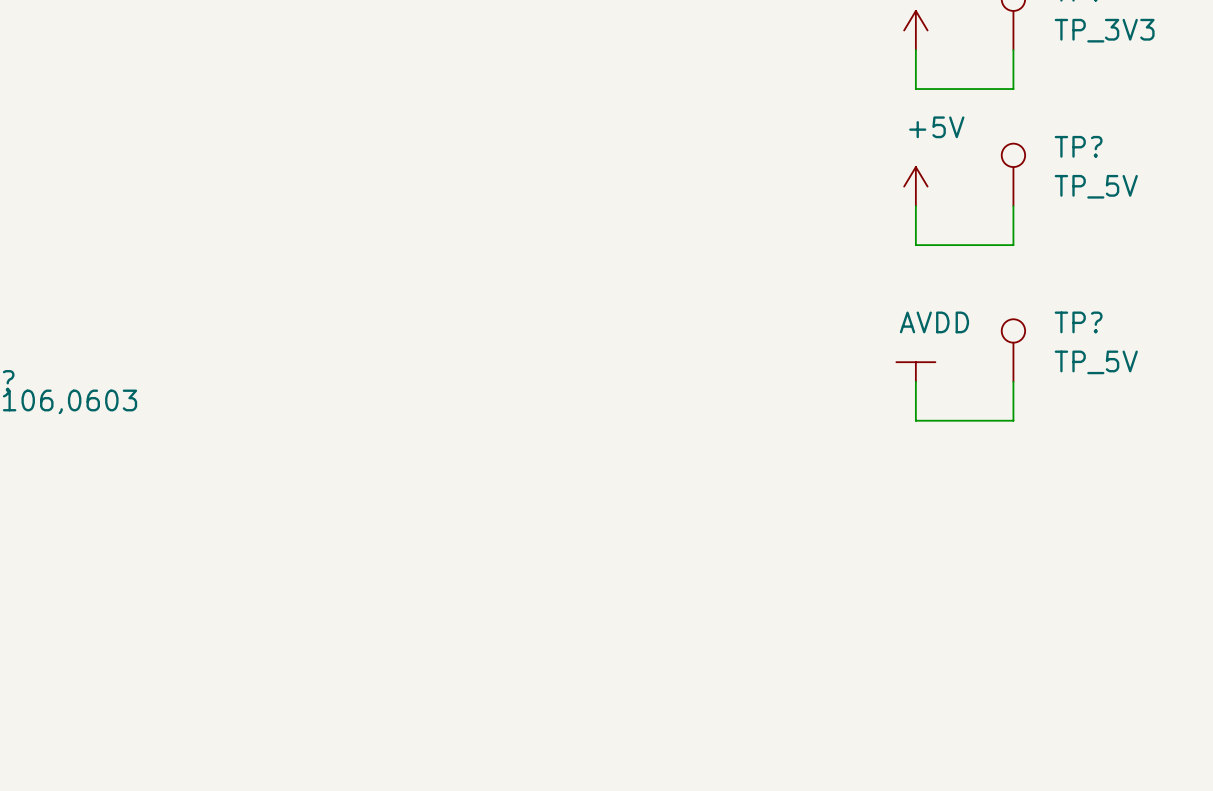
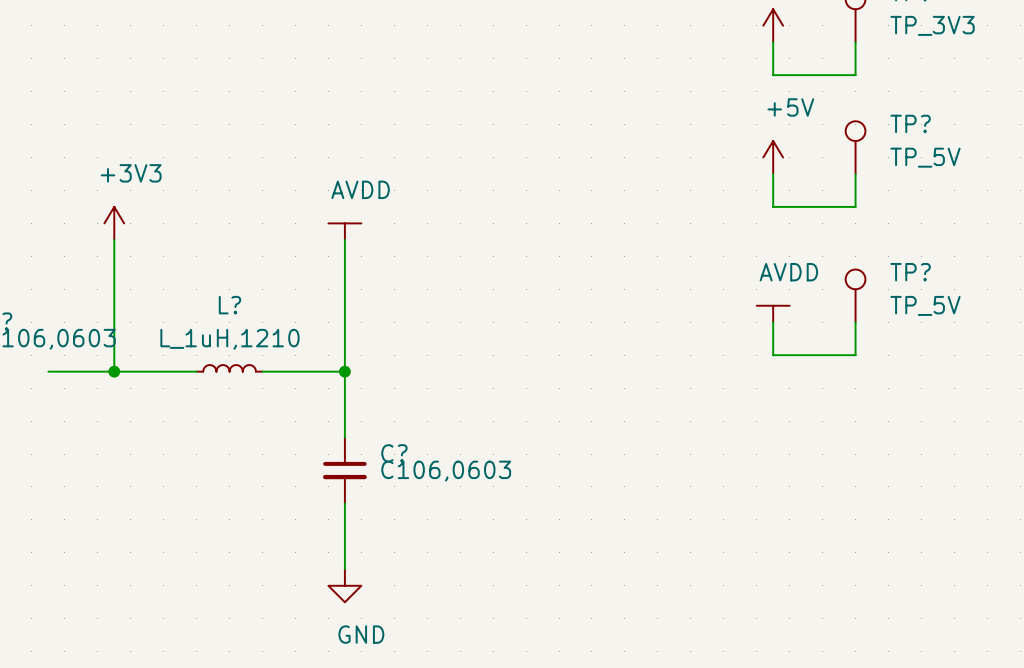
power symbol: none -> +3V3 (114, 223)
power symbol: none -> AVDD (344, 231)
wire: none -> (114, 239) (114, 371)
wire: none -> (344, 239) (344, 437)
L?: none -> L_1uH,1210 (229, 368)
wire: none -> (48, 371) (196, 371)
junction: none -> (114, 371)
wire: none -> (262, 371) (344, 371)
junction: none -> (344, 371)
C?: none -> C106,0603 (344, 470)
wire: none -> (344, 503) (344, 569)
power symbol: none -> GND (344, 585)

